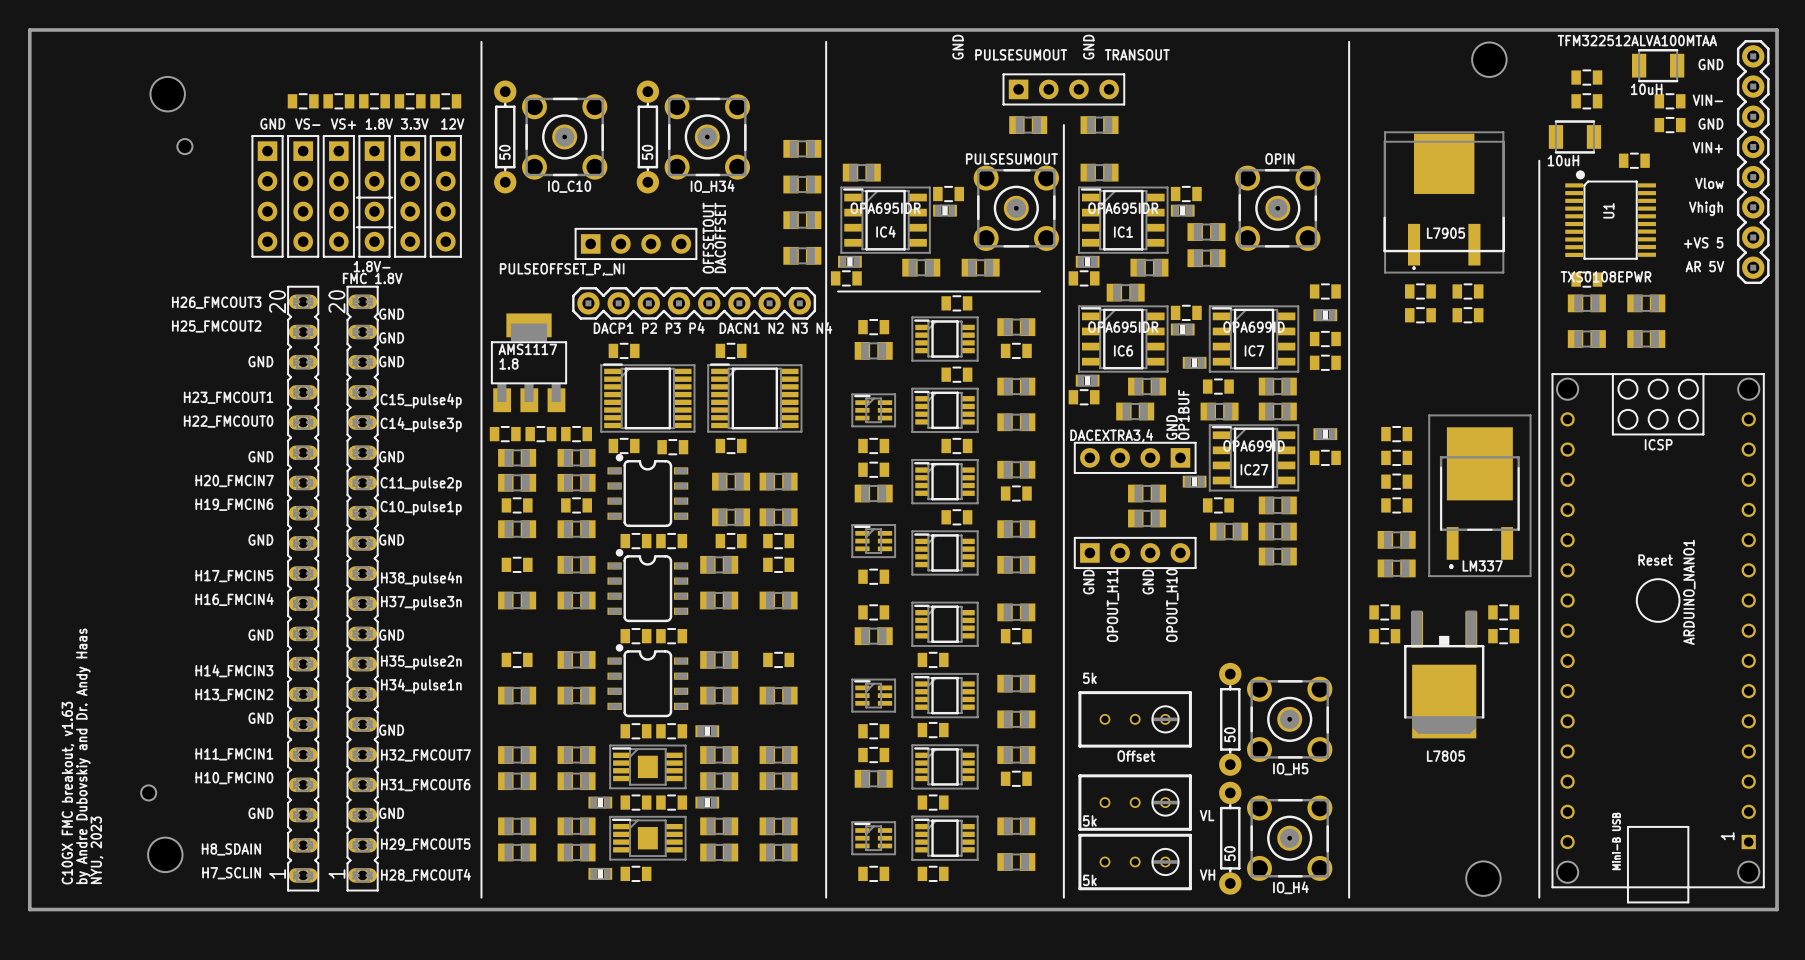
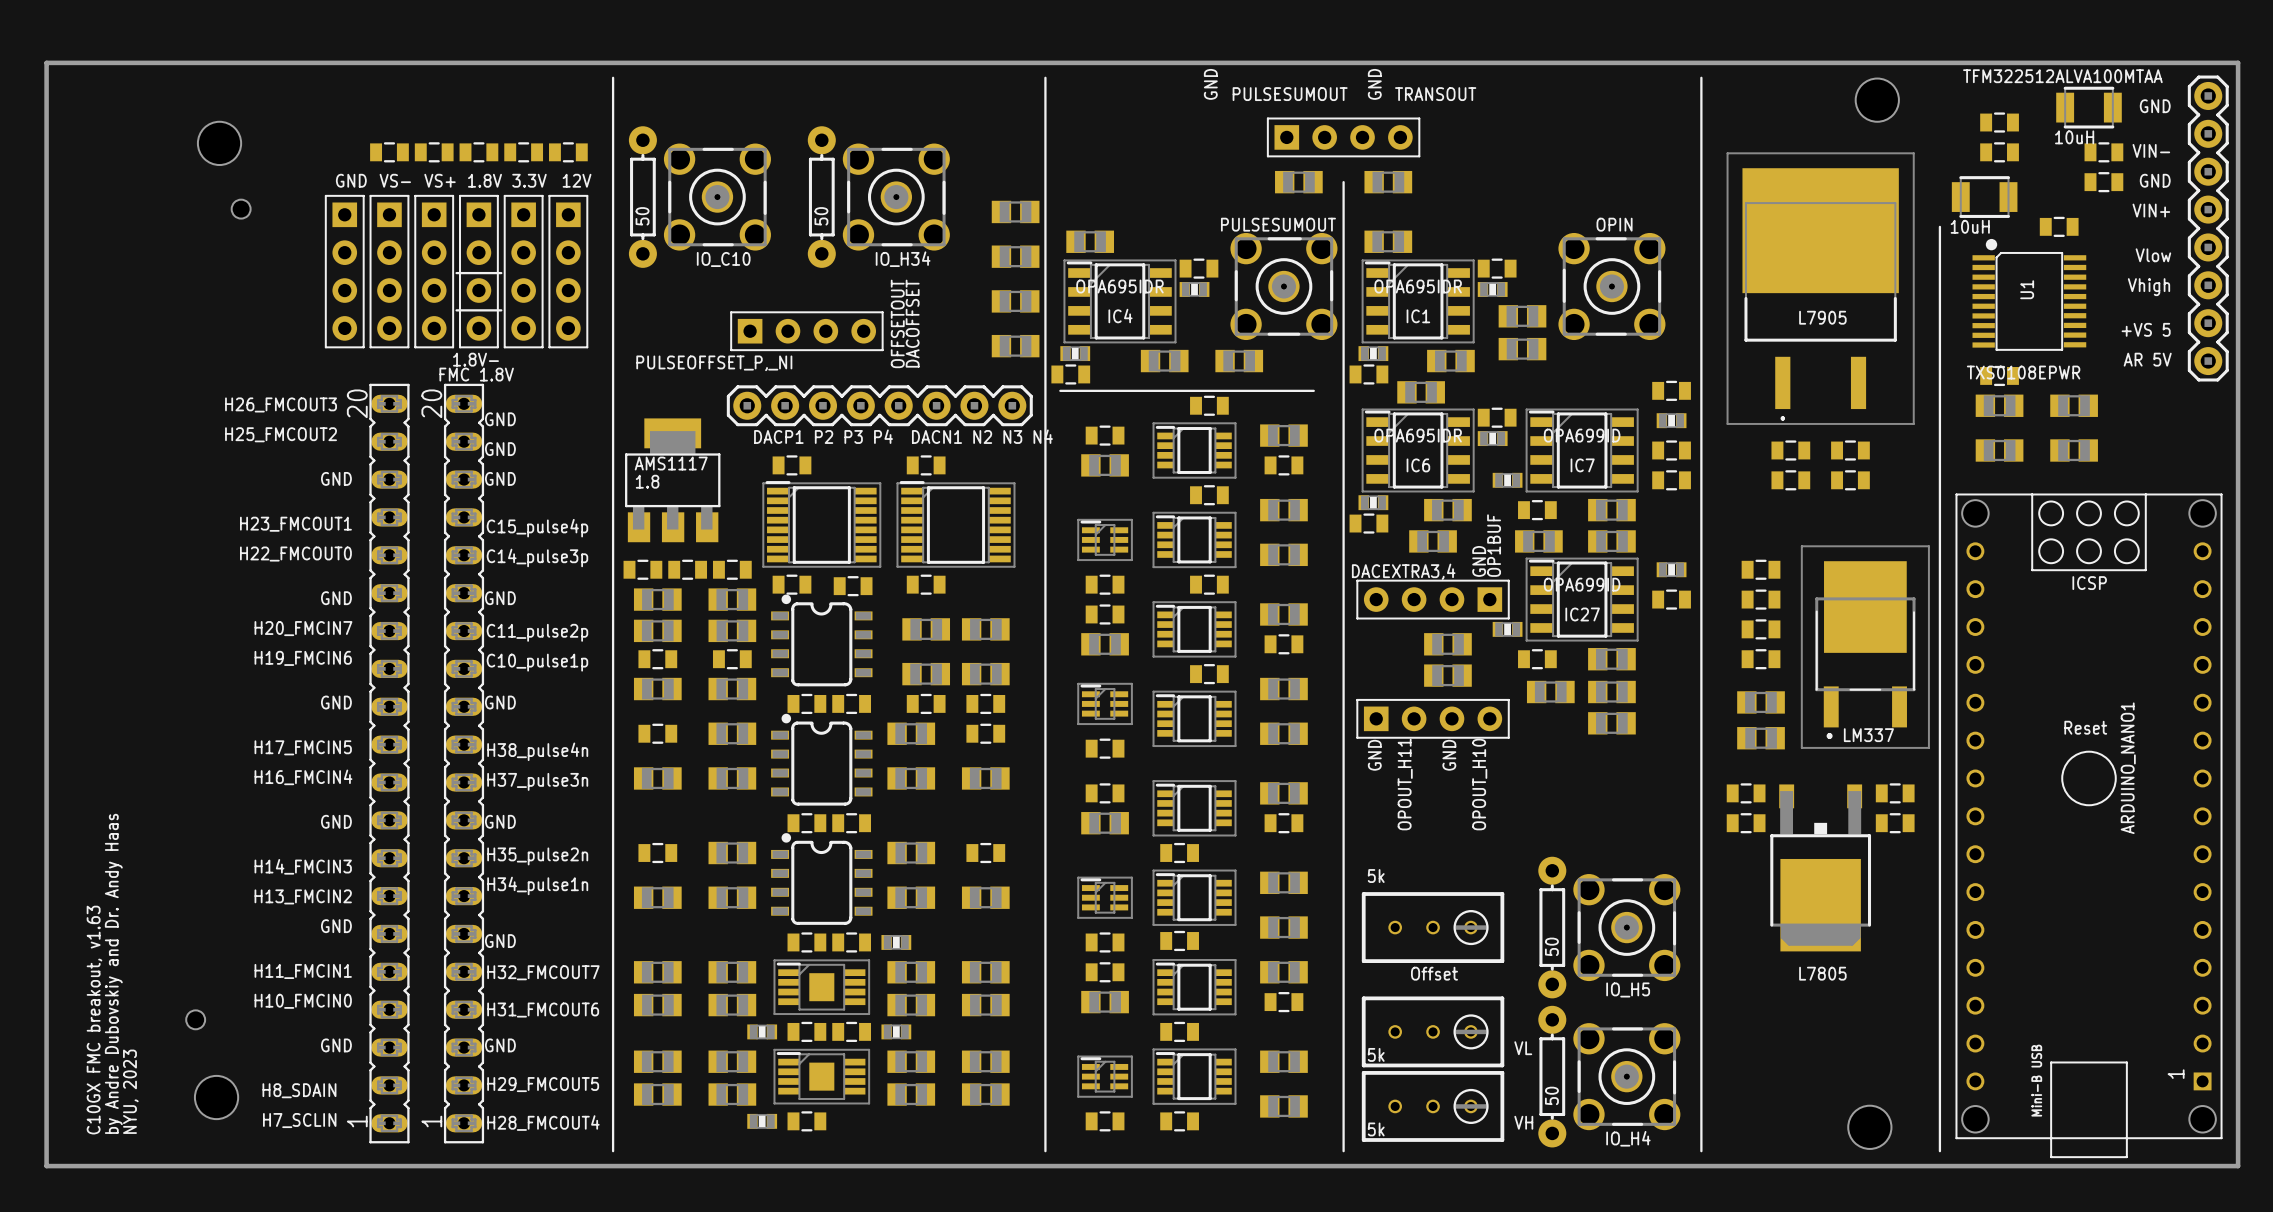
part footprint: [1383, 131, 1505, 274] -> [1726, 152, 1915, 425]
part: (1420, 291) -> none
part: (1467, 291) -> none
part: (1420, 315) -> none
part: (1467, 315) -> none
part: none -> (1790, 450)
part: none -> (1850, 450)
part: none -> (1790, 480)
part: none -> (1850, 480)
part footprint: [1404, 610, 1485, 739] -> [1770, 784, 1872, 952]

